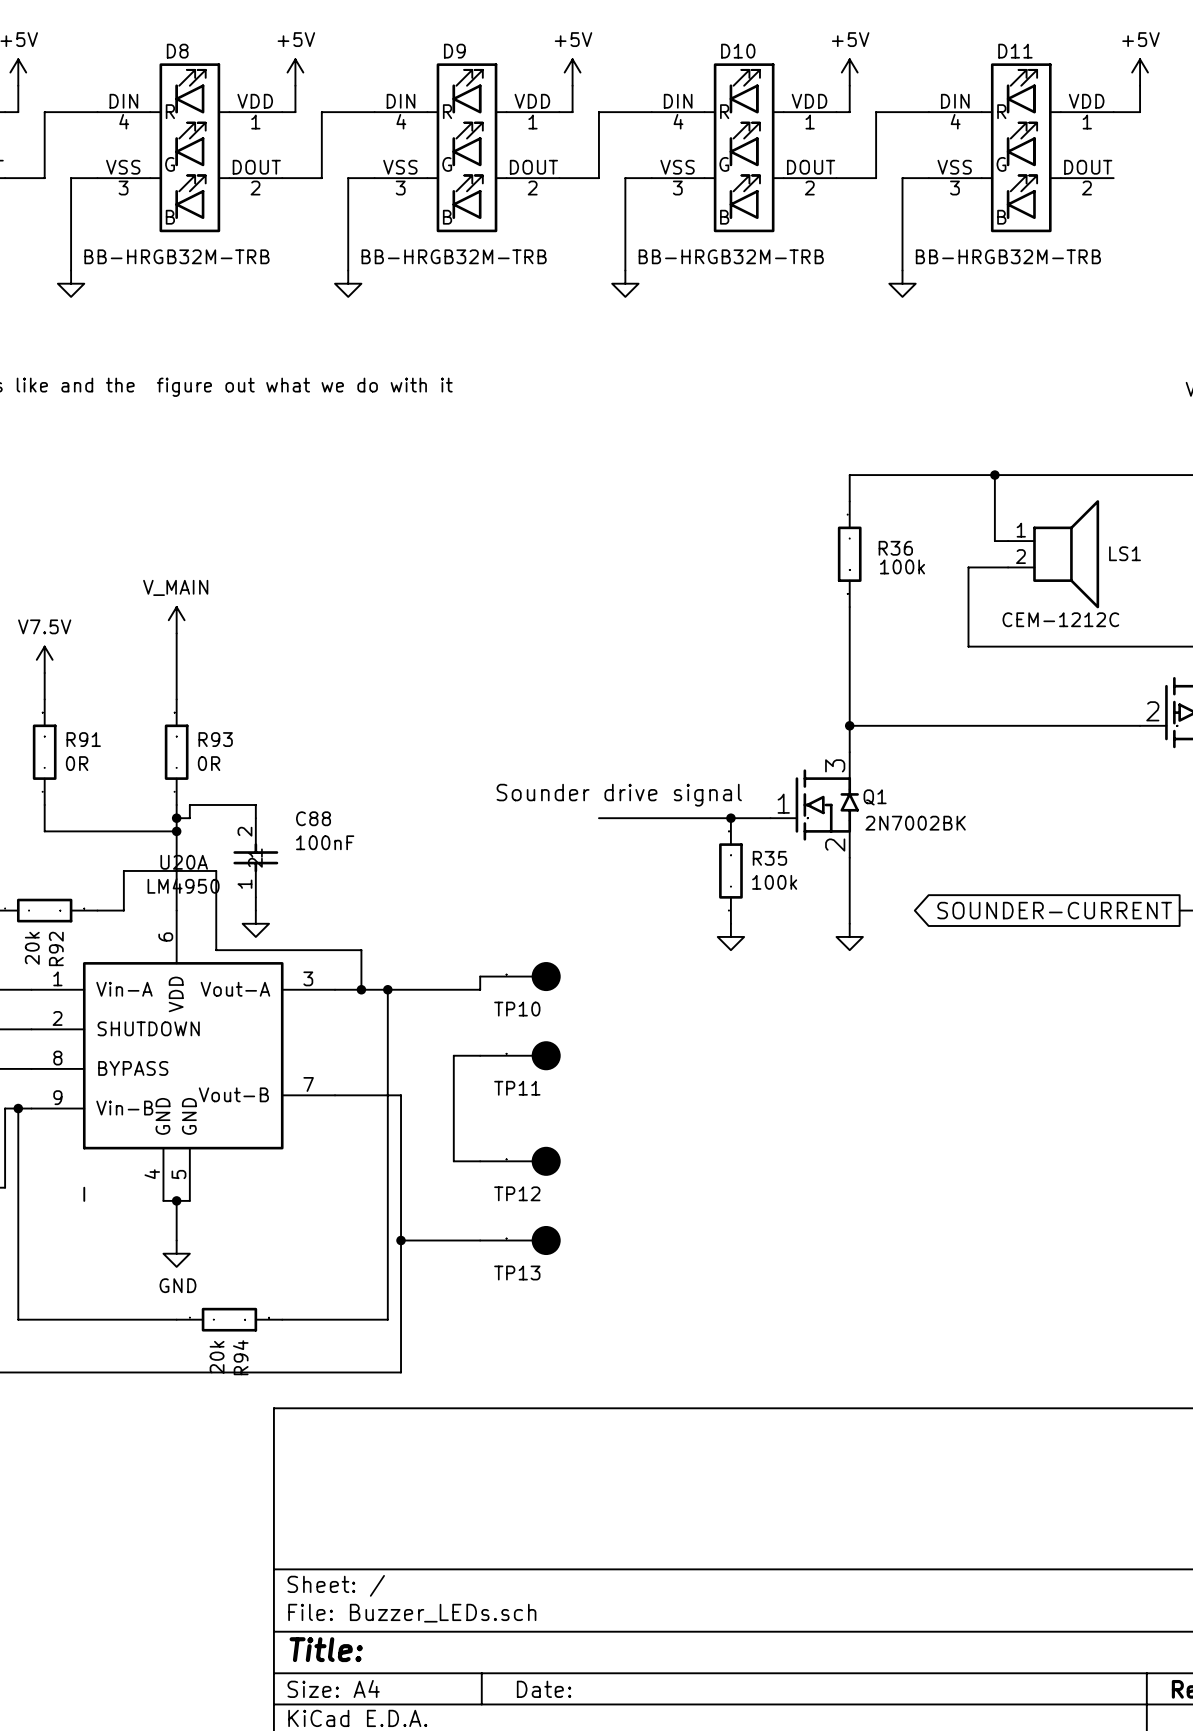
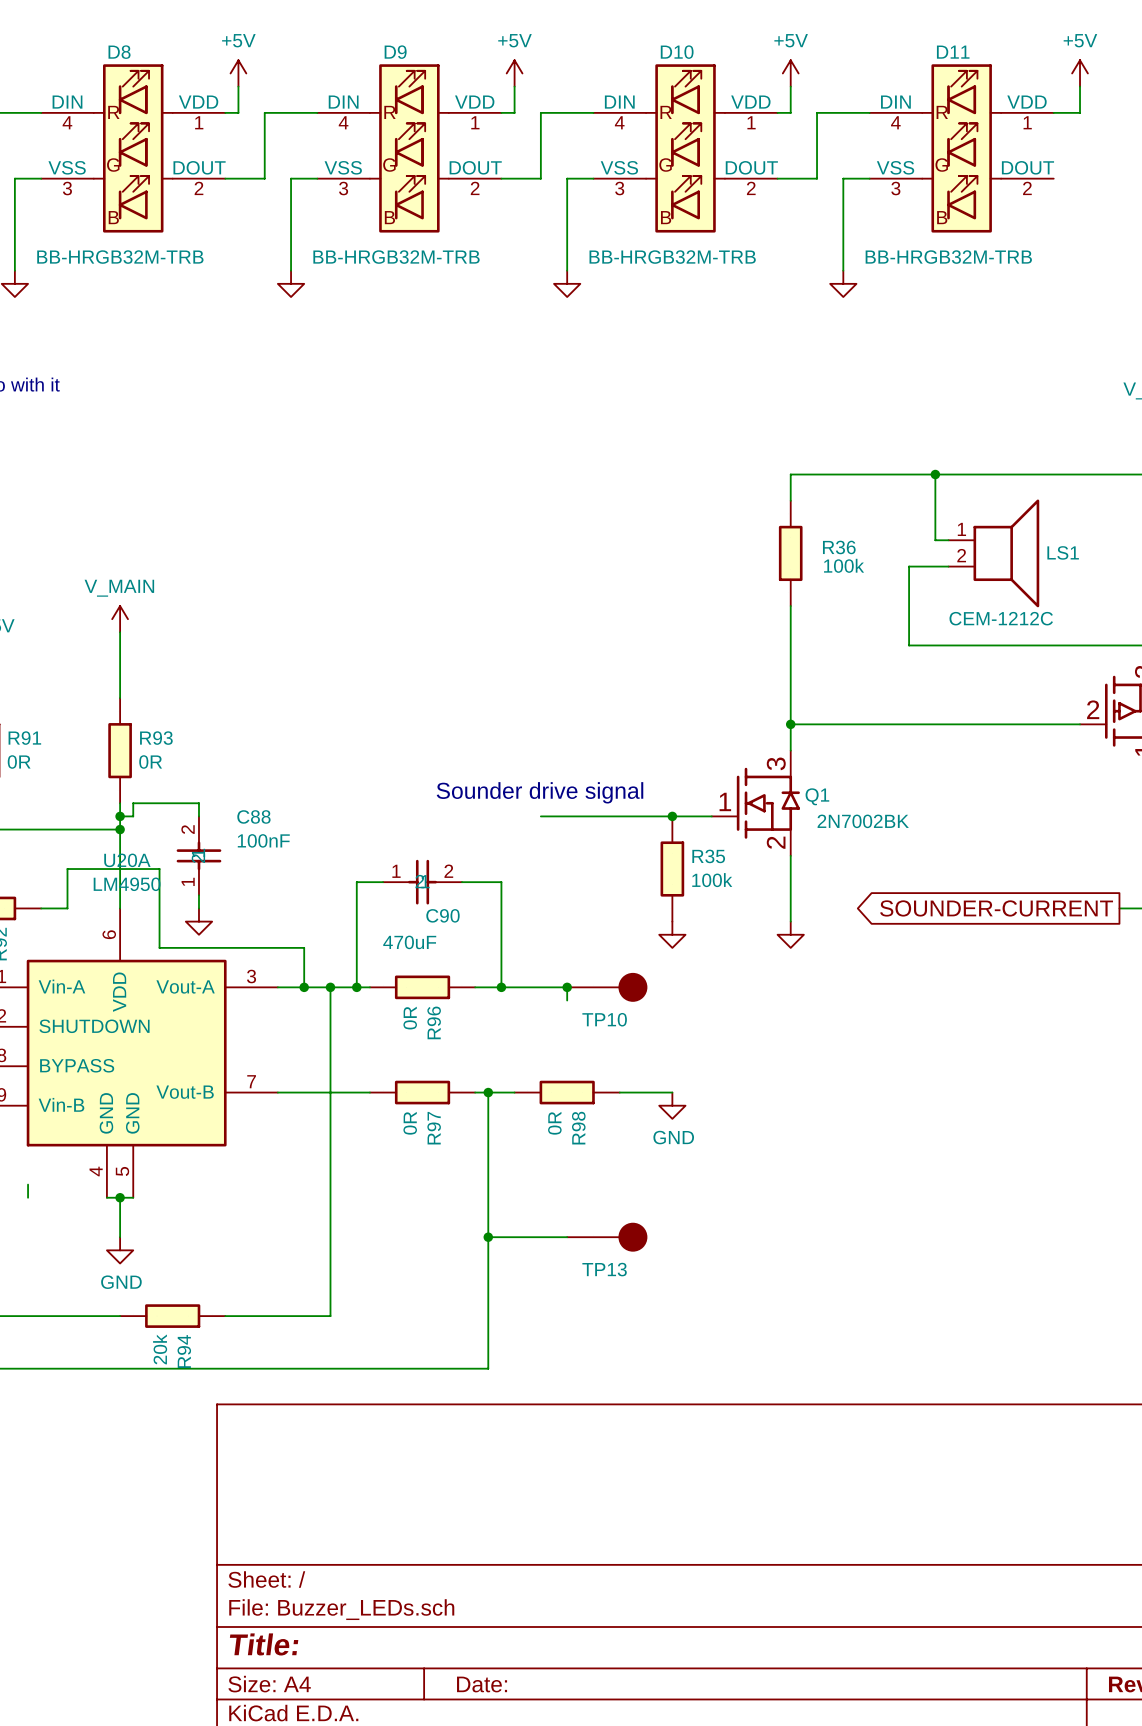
wire: none -> (383, 882) (356, 882) (356, 987)
C90: none -> (422, 882)
wire: none -> (461, 882) (501, 882) (501, 987)
TP10 position: (520, 976) -> (607, 987)
junction: none -> (356, 987)
R96: none -> (422, 987)
wire: none -> (475, 987) (567, 987) (567, 1000)
junction: none -> (501, 987)
junction: none -> (567, 987)
wire: (480, 1055) (453, 1055) (453, 1161) (480, 1161) -> none
TP11: (520, 1055) -> none
wire: (401, 1095) (401, 1372) -> (488, 1092) (488, 1368) (343, 1368)
wire: none -> (343, 1092) (369, 1092)
R97: none -> (422, 1092)
wire: none -> (475, 1092) (514, 1092)
junction: none -> (488, 1092)
R98: none -> (567, 1092)
wire: none -> (619, 1092) (672, 1092)
power symbol: none -> GND (672, 1105)
TP12: (520, 1161) -> none
wire: (401, 1240) (480, 1240) -> (488, 1237) (567, 1237)
junction: (401, 1240) -> none
TP13 position: (520, 1240) -> (607, 1237)
junction: none -> (488, 1237)

